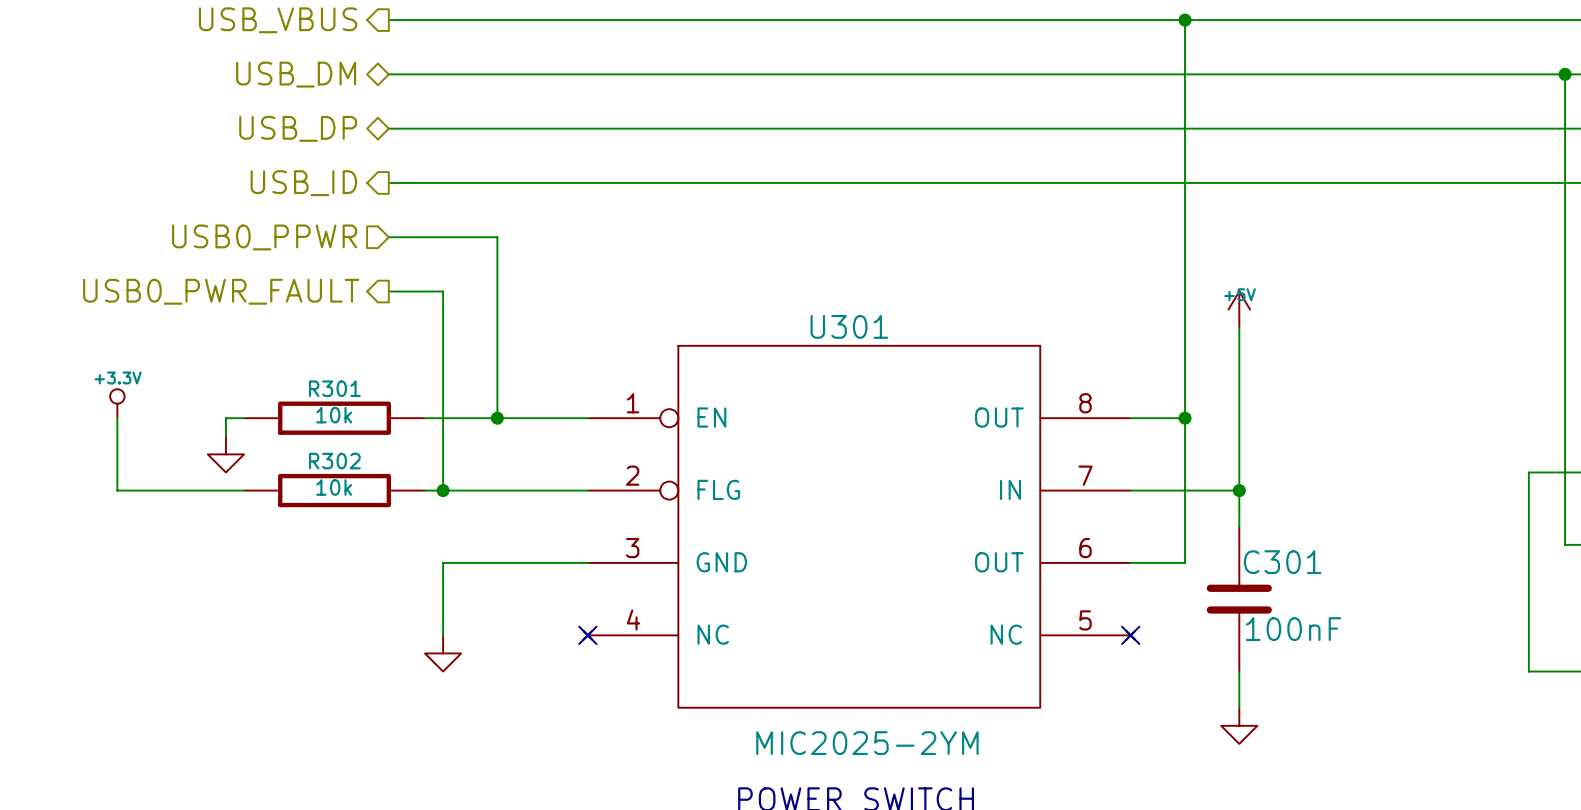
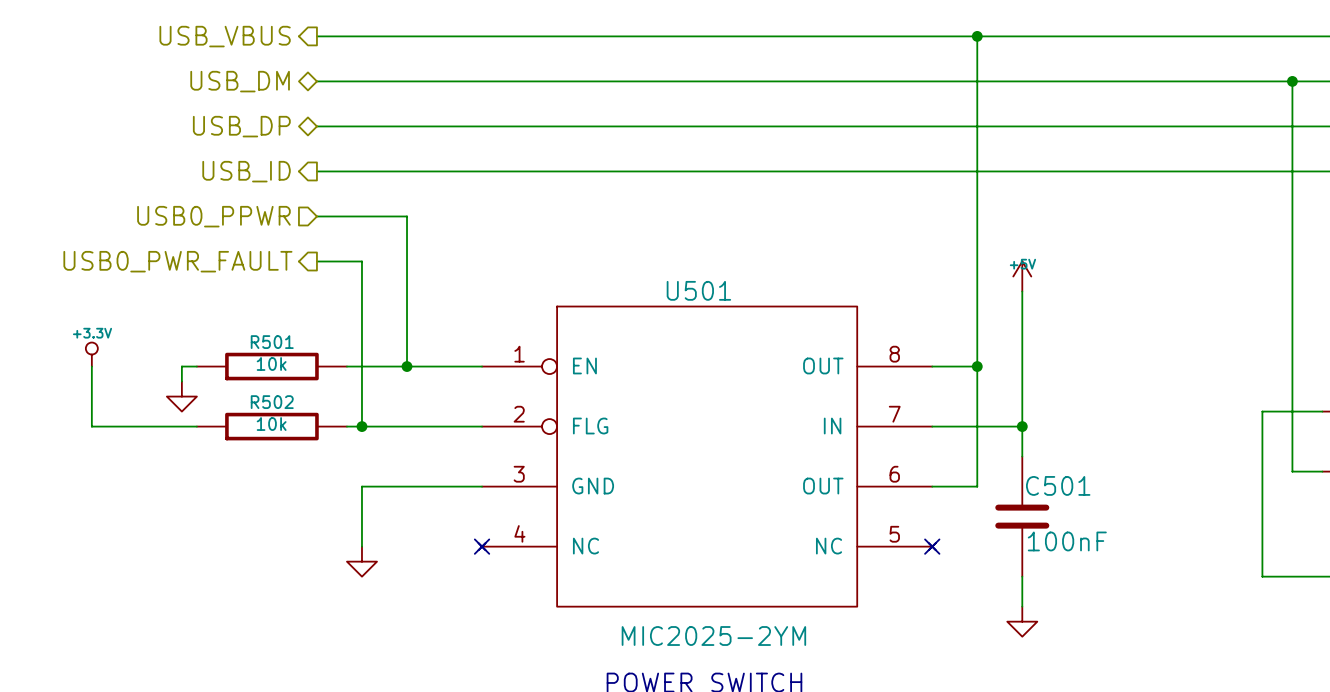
U301 name: U301 (849, 326) -> U501 (698, 290)
R301 name: R301 (334, 388) -> R501 (272, 342)
R302 name: R302 (334, 461) -> R502 (272, 402)
C301 name: C301 (1282, 562) -> C501 (1058, 485)

